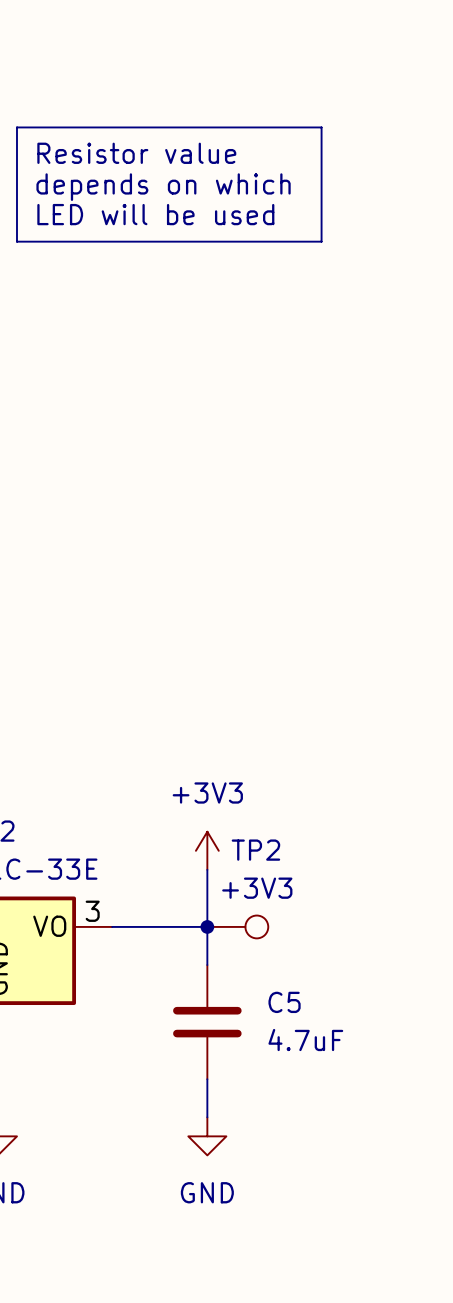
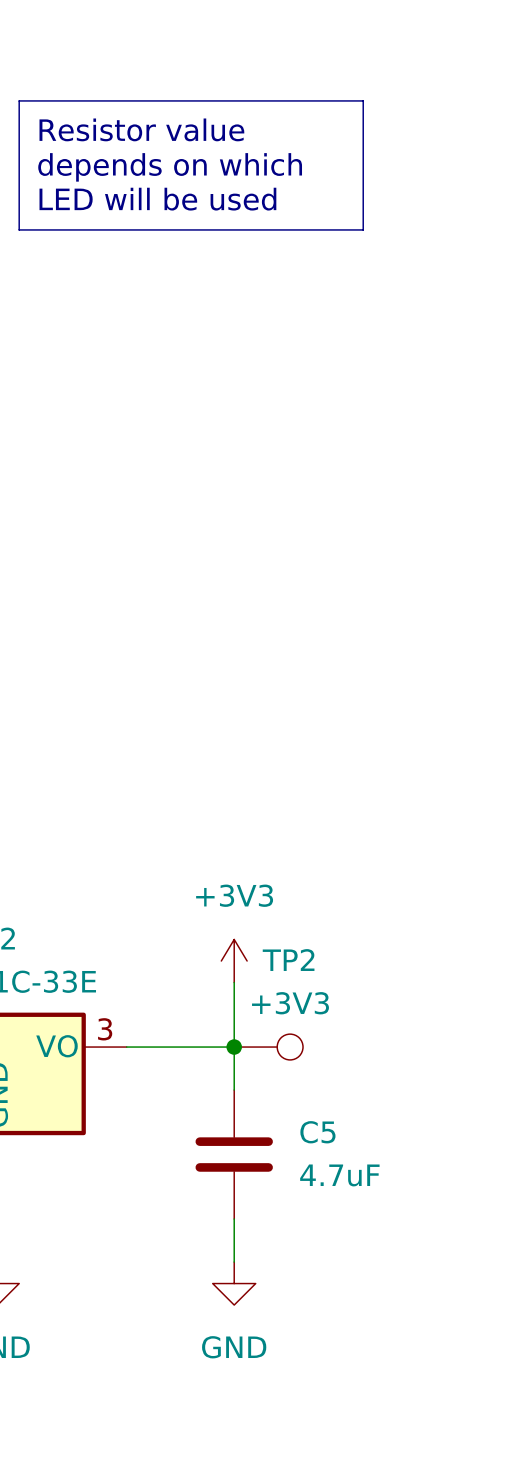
text: none -> Resistor value (141, 129)
line: (16, 127) (321, 127) -> (19, 143) (19, 100) (363, 100) (363, 143)
text: Resistor value (136, 153) -> depends on which (170, 167)
text: depends on which (163, 187) -> LED will be used (157, 199)
line: (16, 203) (16, 241) (321, 241) (321, 203) -> (19, 229) (363, 229)
text: LED will be used (155, 214) -> none

